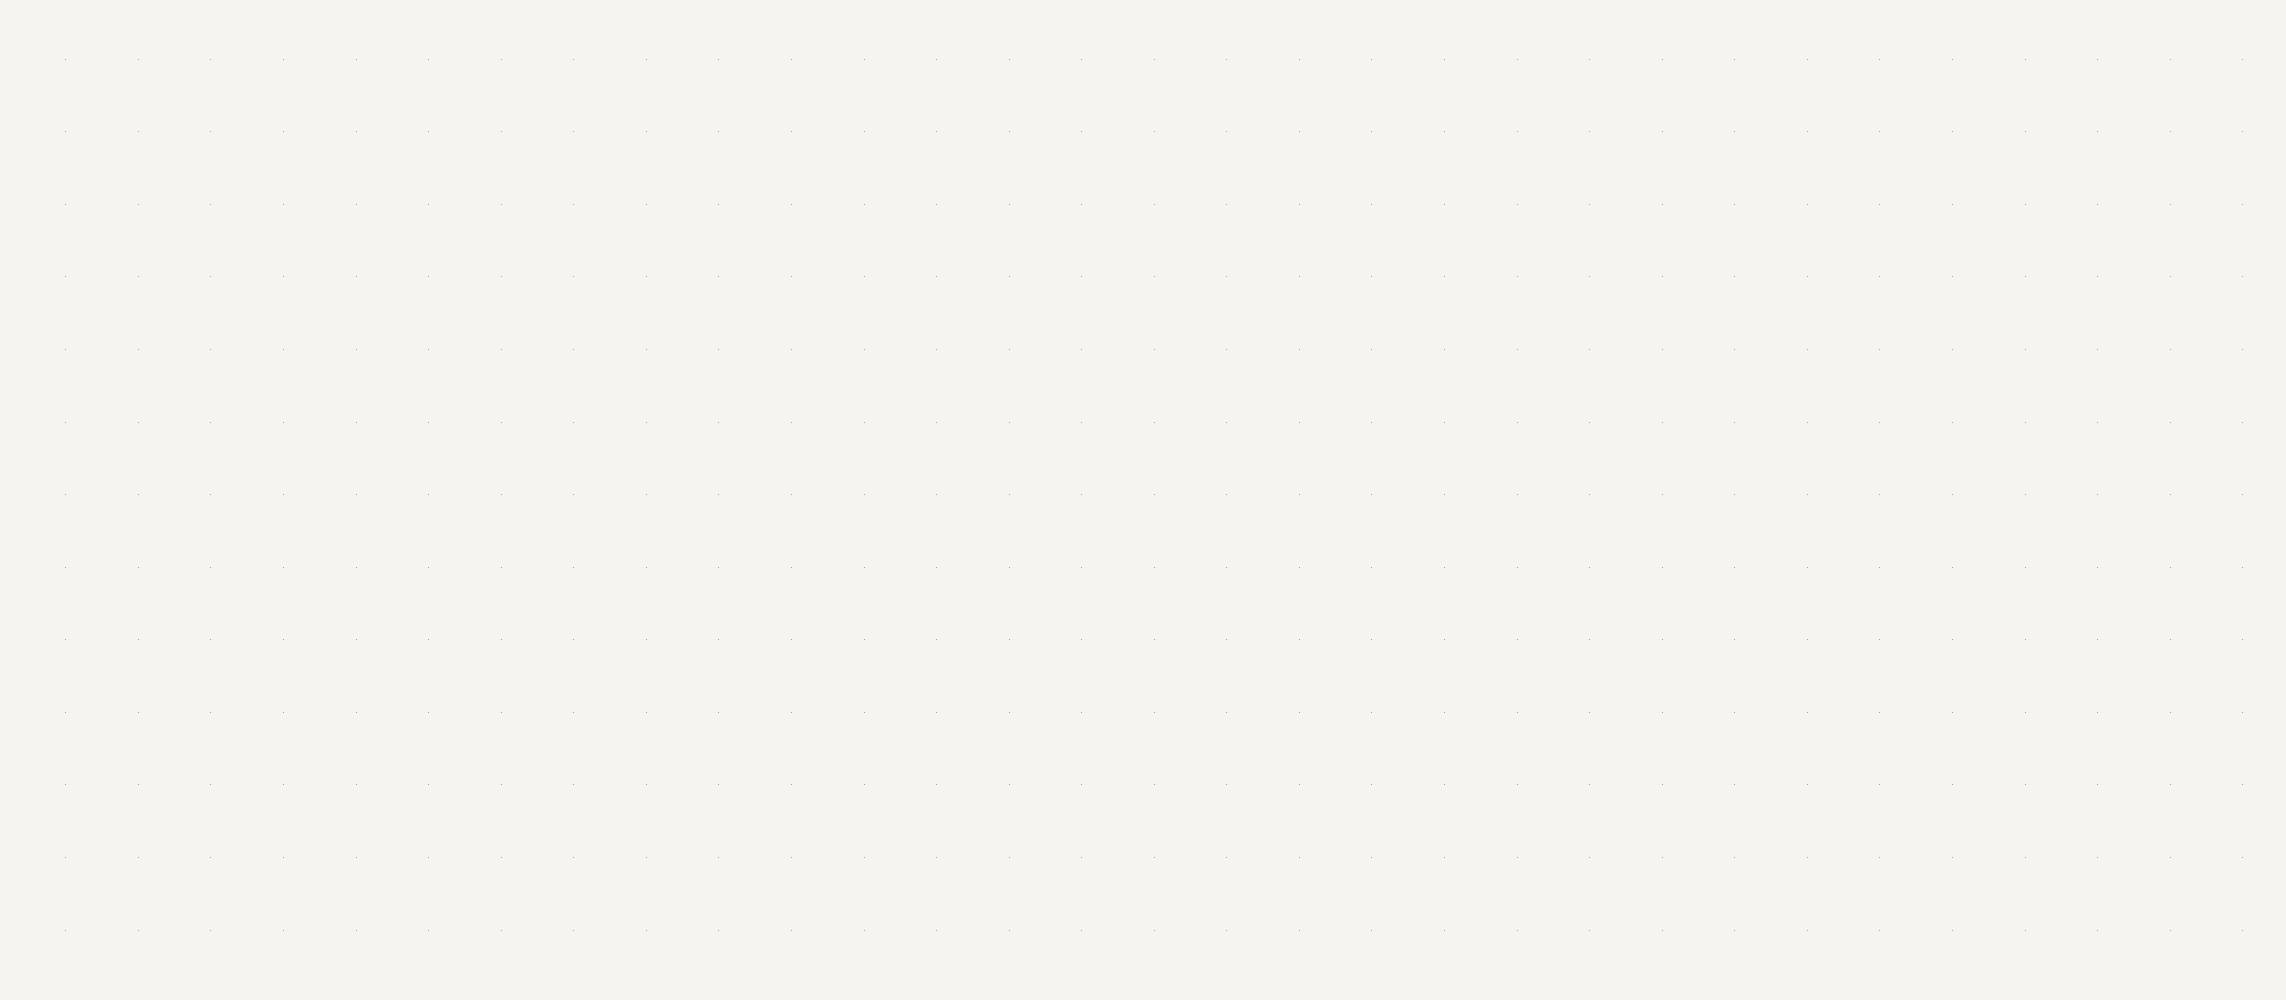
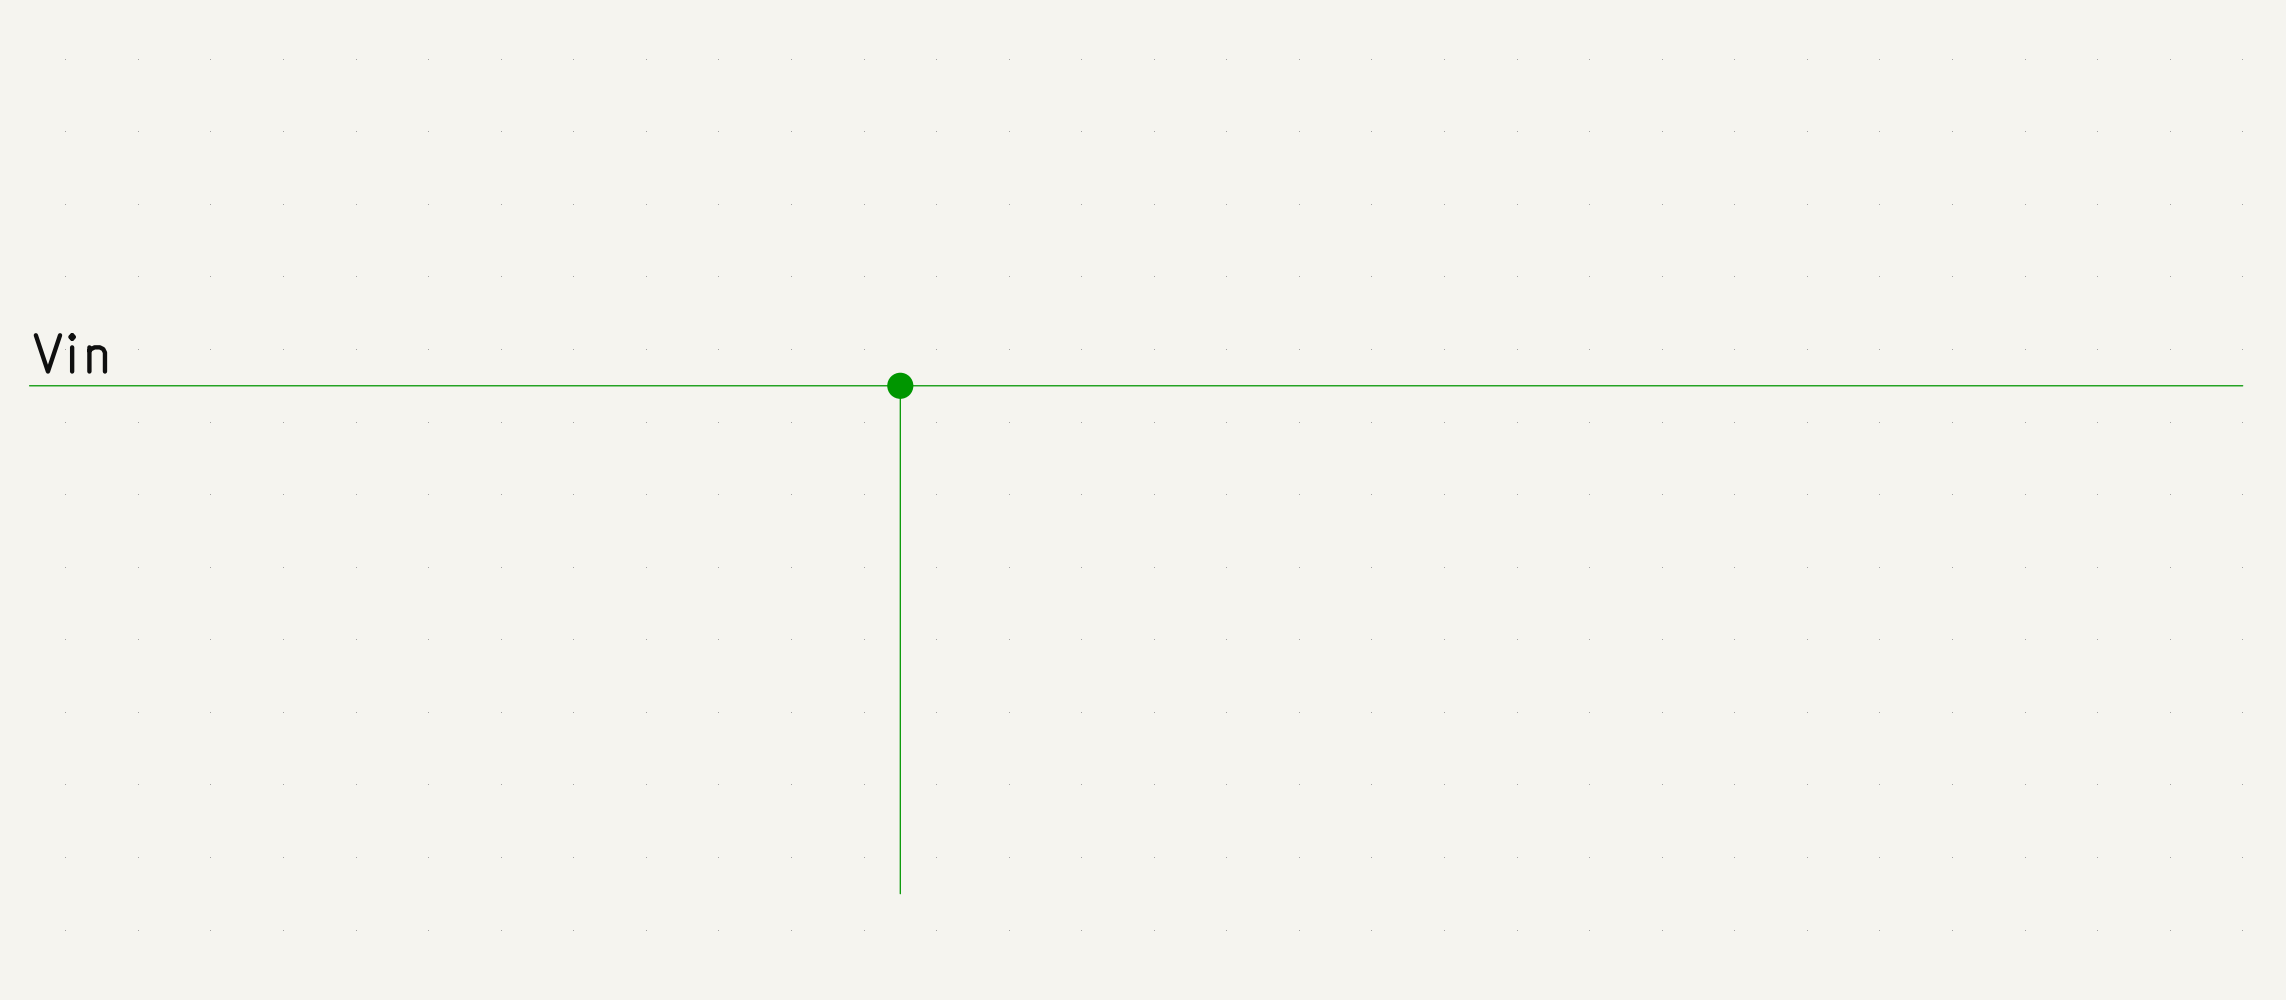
label: none -> Vin (70, 353)
wire: none -> (29, 385) (2242, 385)
wire: none -> (900, 385) (900, 893)
junction: none -> (900, 385)

